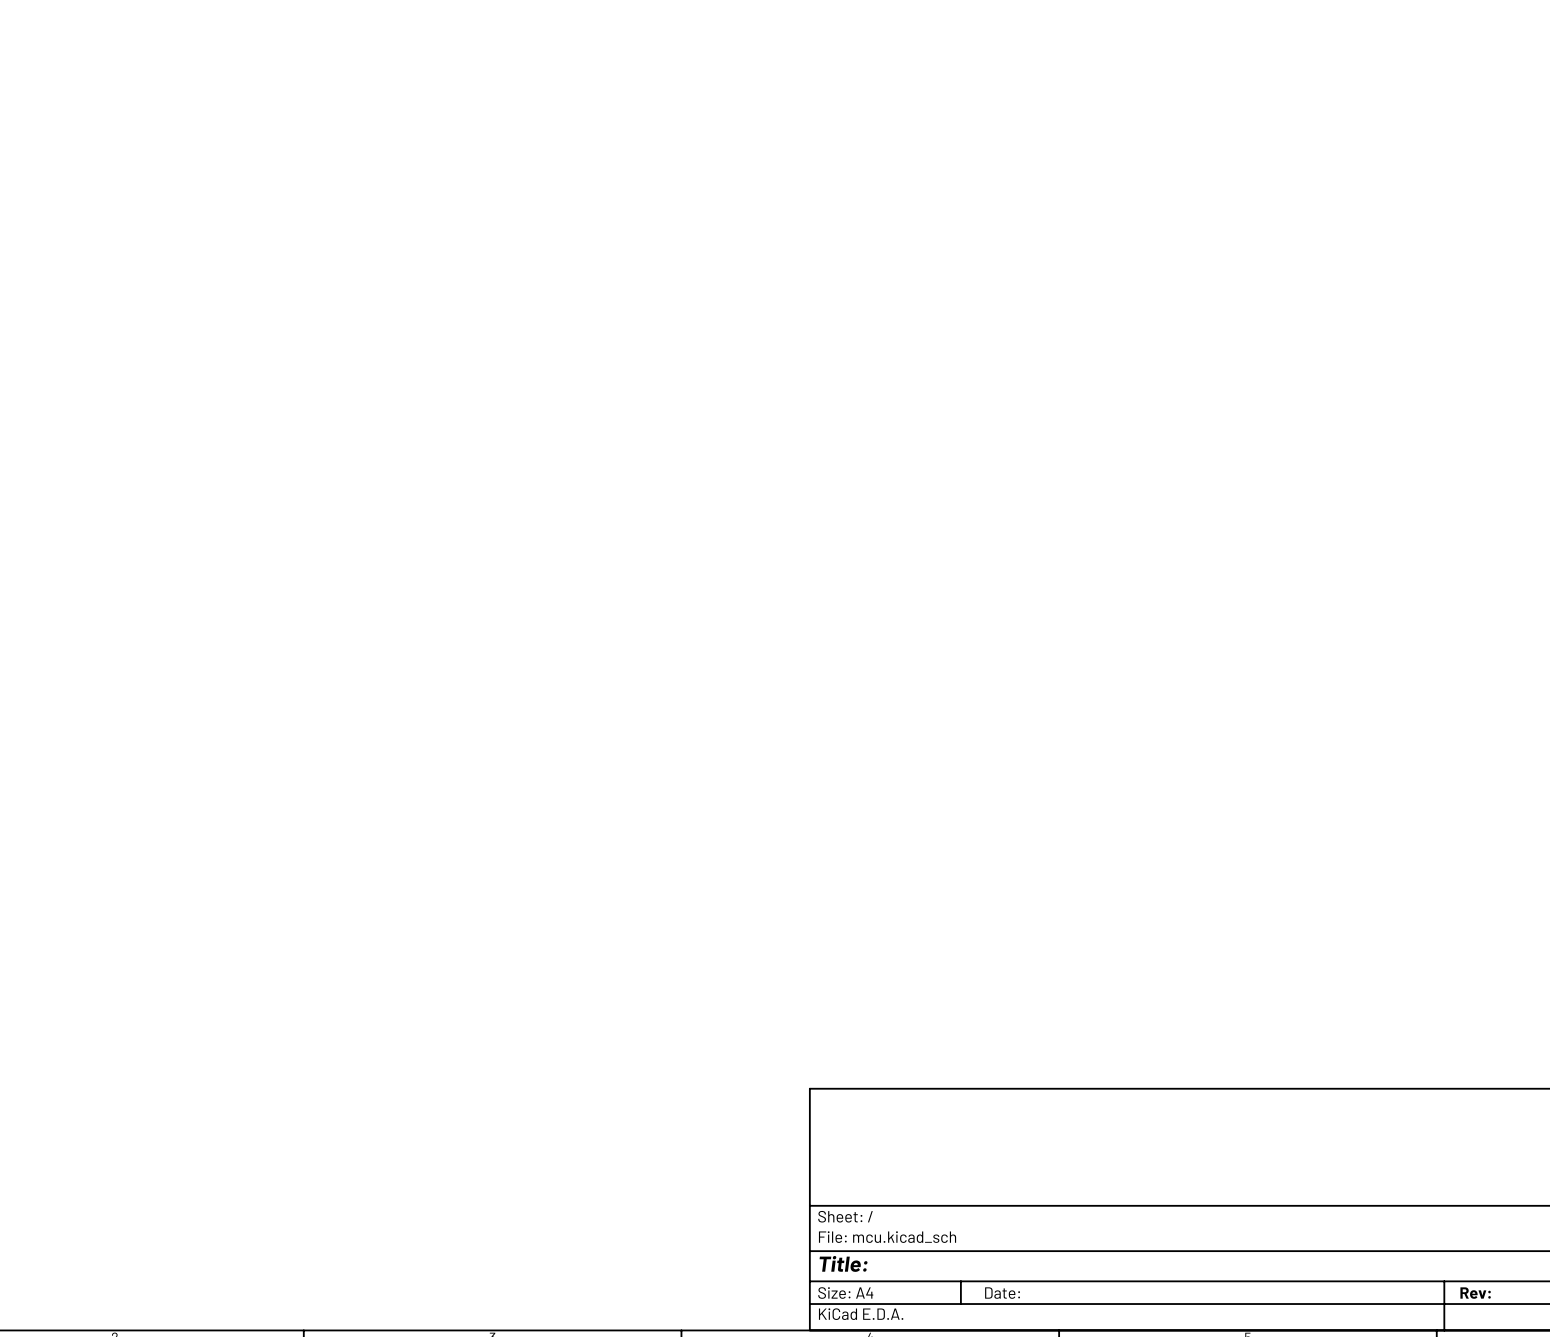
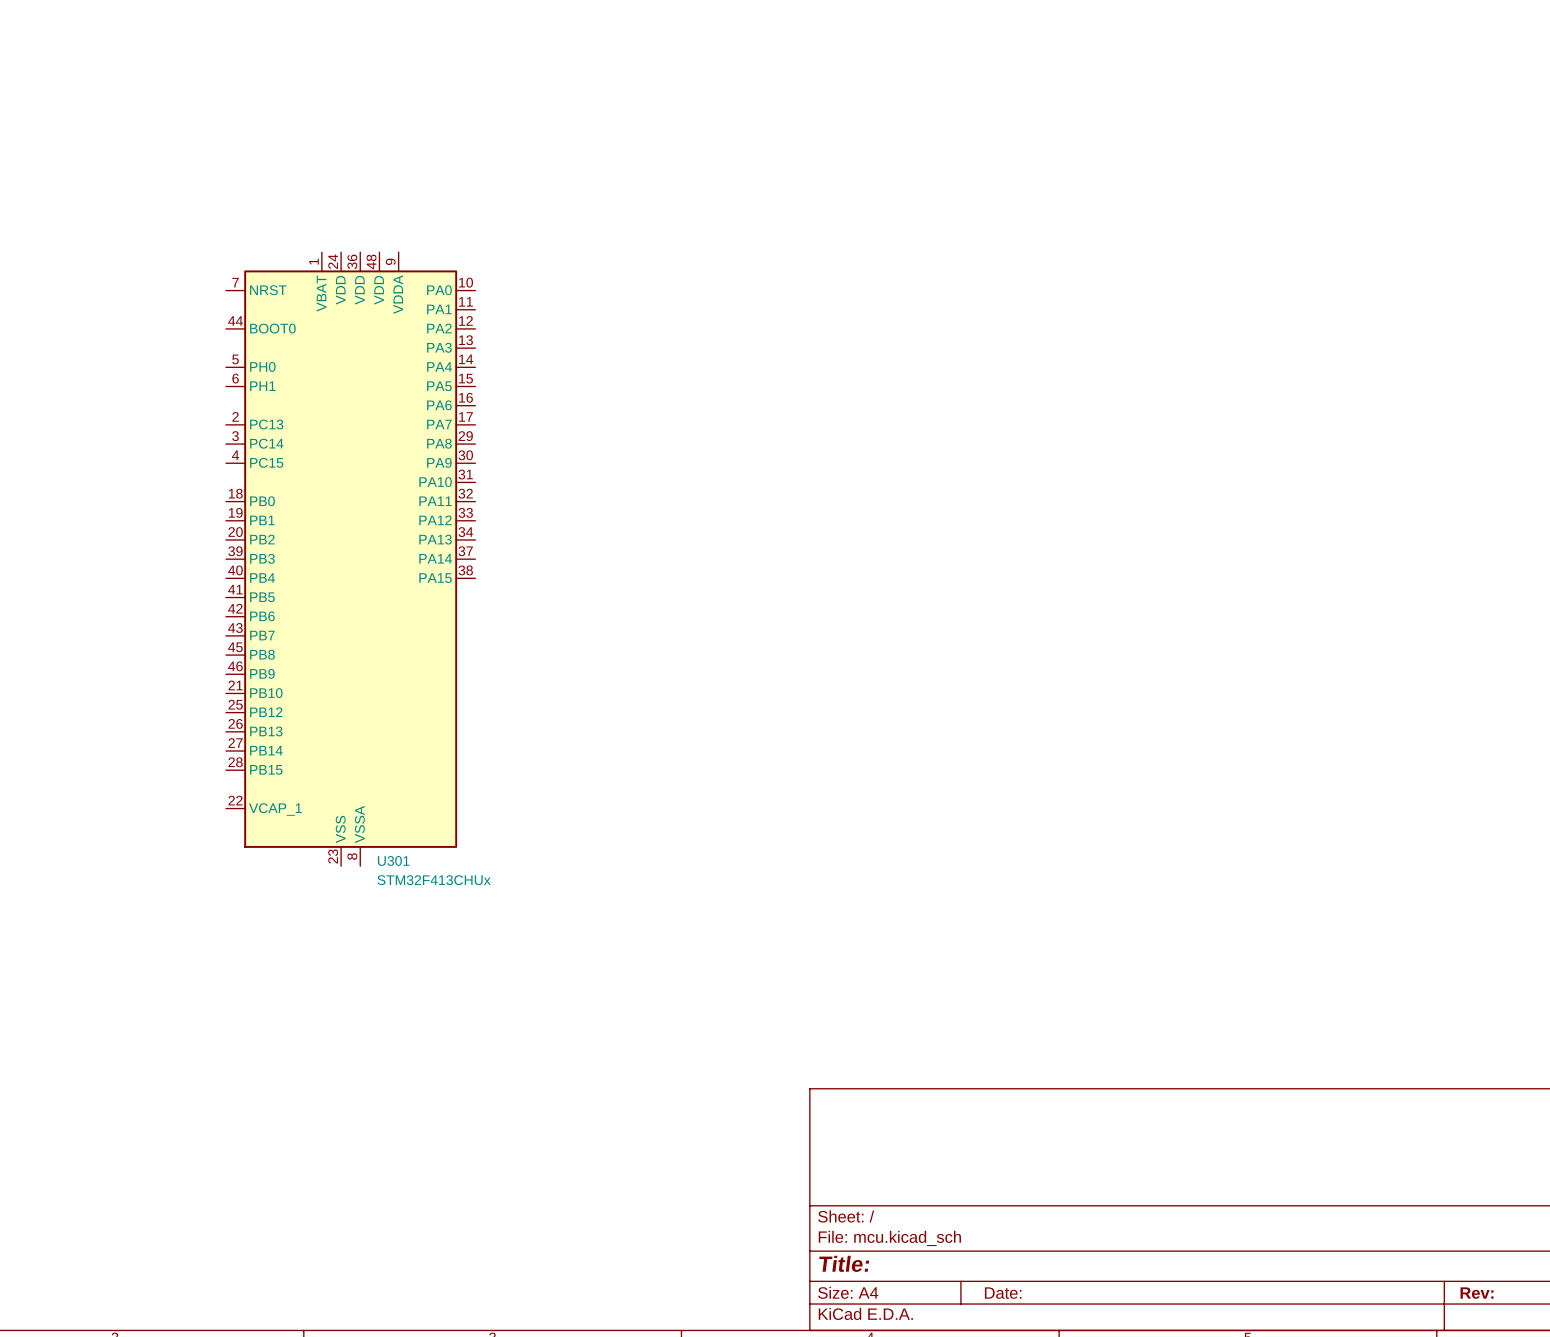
U301: none -> STM32F413CHUx (350, 559)

